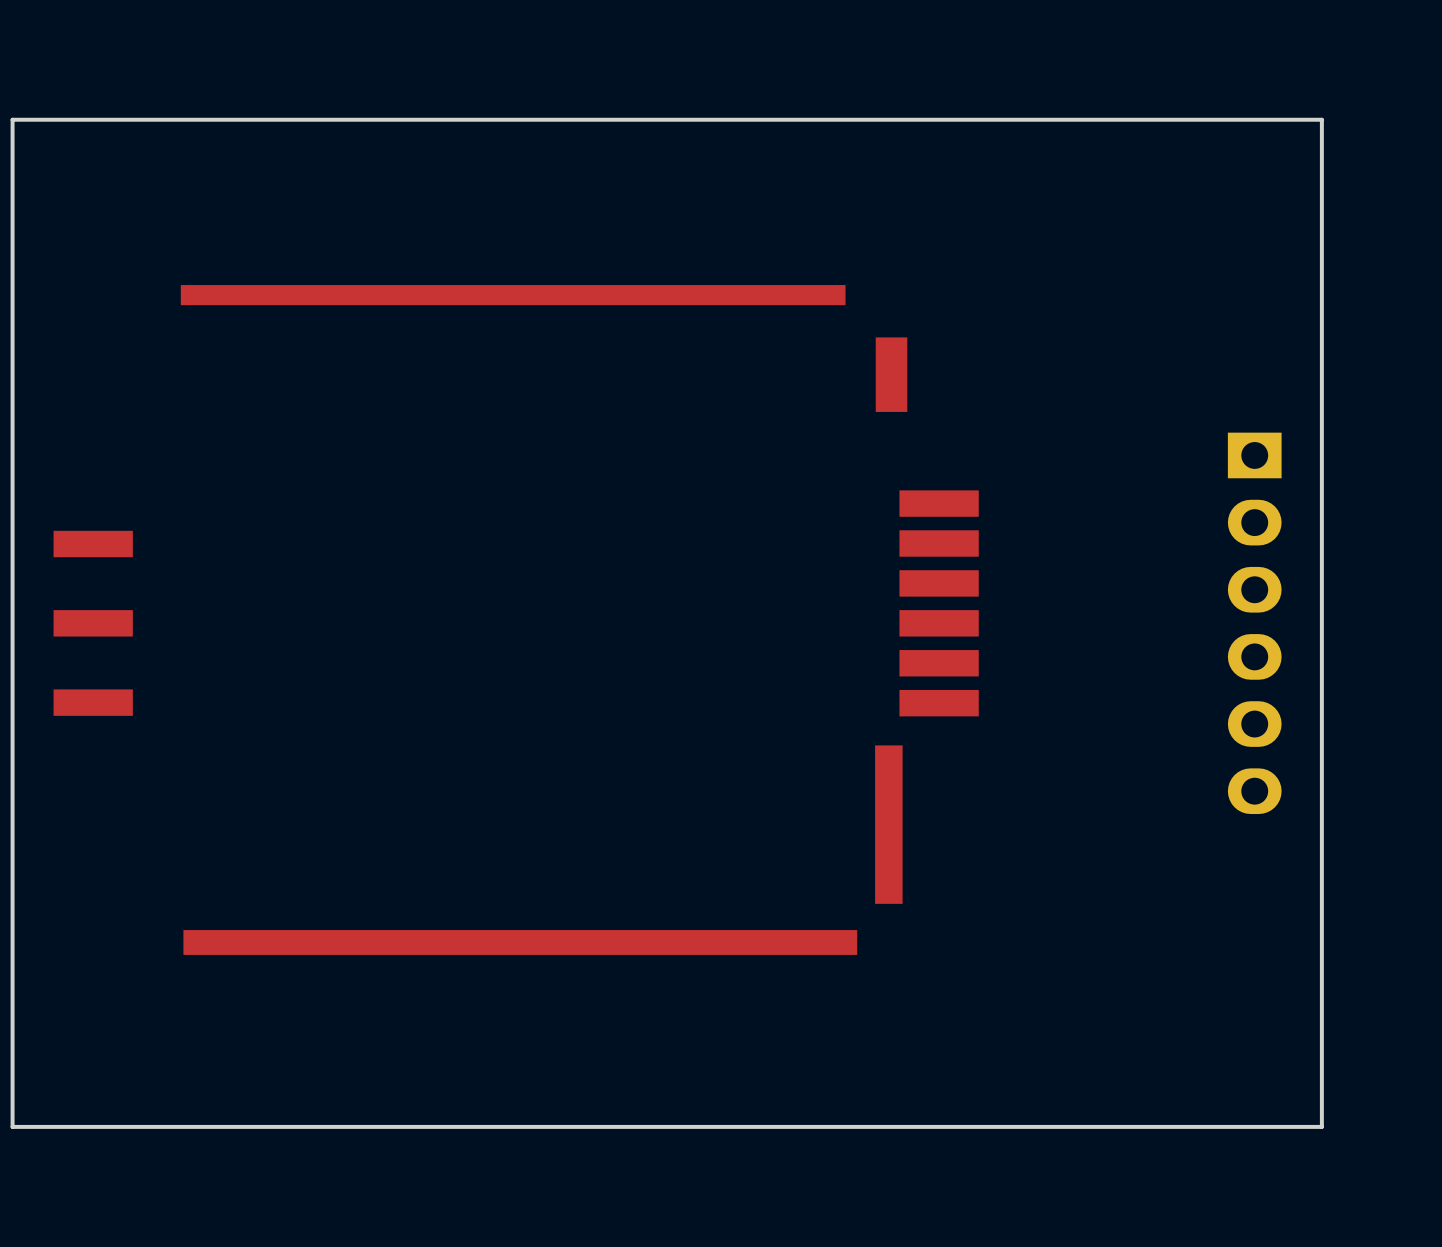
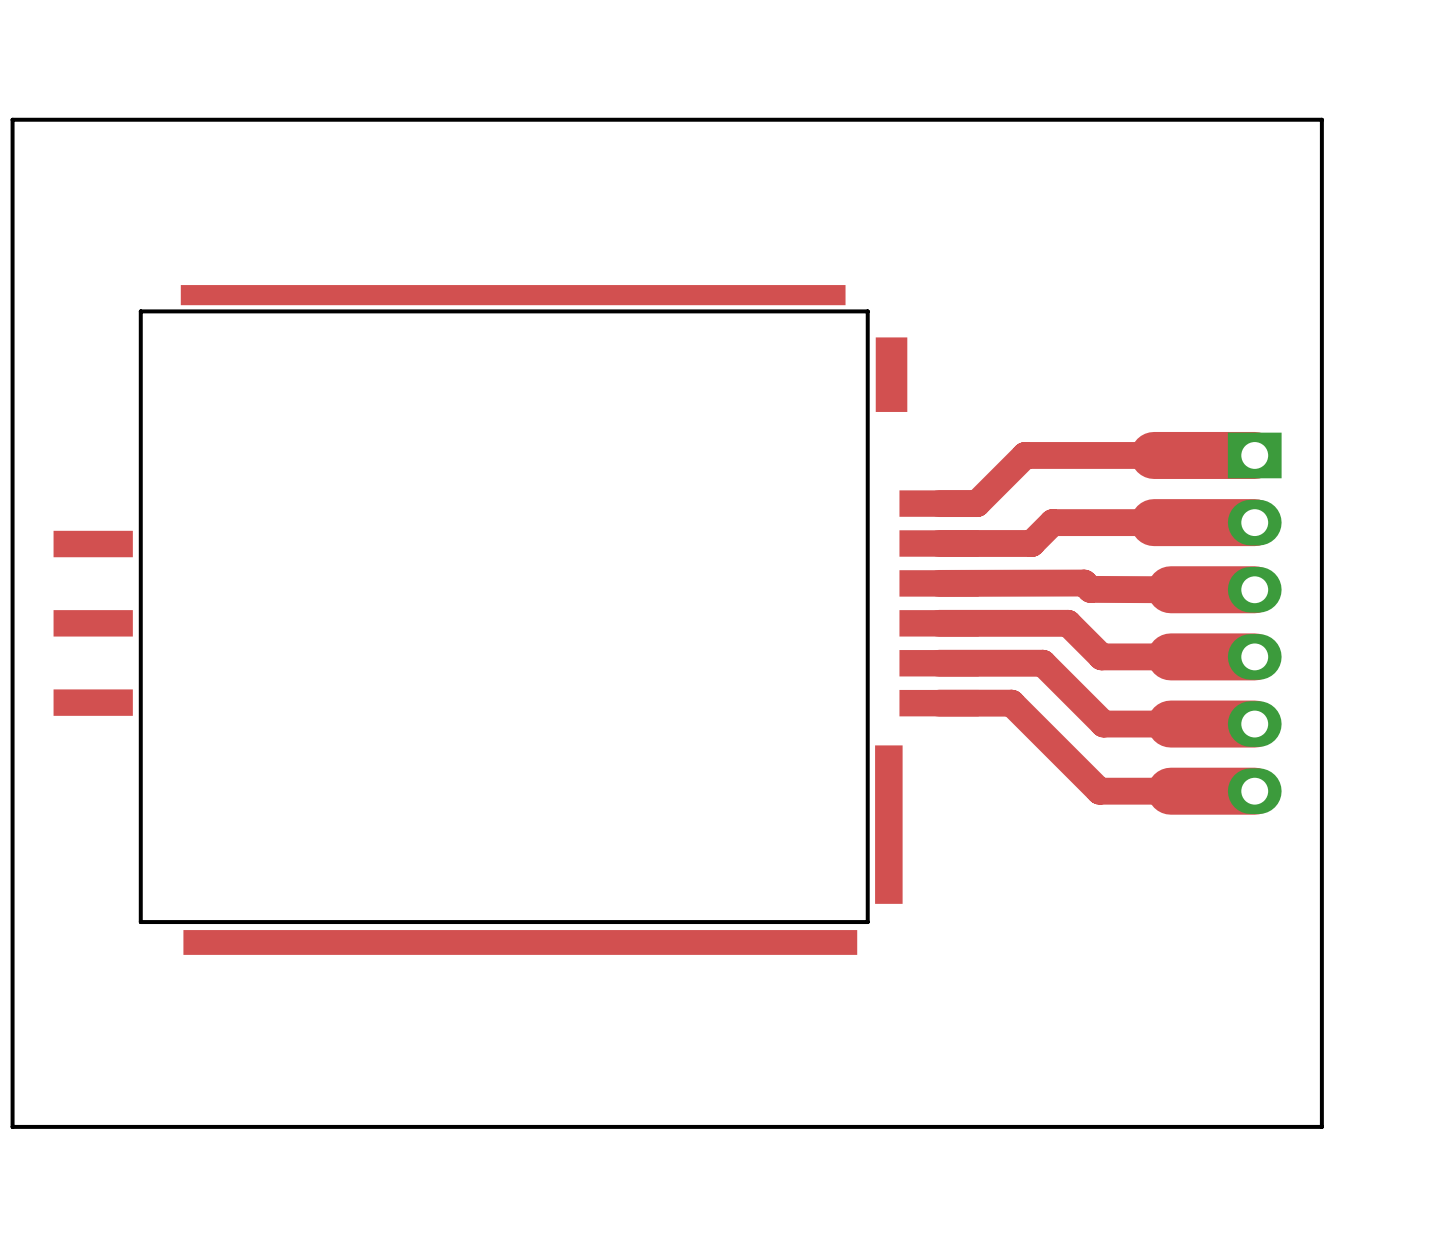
board edge: none -> (867, 311) (140, 311) (140, 922) (867, 922) (867, 311)
top track: none -> (1254, 455) (1025, 455) (977, 503) (939, 503)
top track: none -> (1254, 522) (1052, 522) (1031, 543) (939, 543)
top track: none -> (939, 583) (1084, 583) (1090, 589) (1254, 589)
top track: none -> (939, 623) (1068, 623) (1101, 656) (1254, 656)
top track: none -> (939, 663) (1042, 663) (1103, 724) (1254, 724)
top track: none -> (939, 703) (1011, 703) (1099, 791) (1254, 791)

